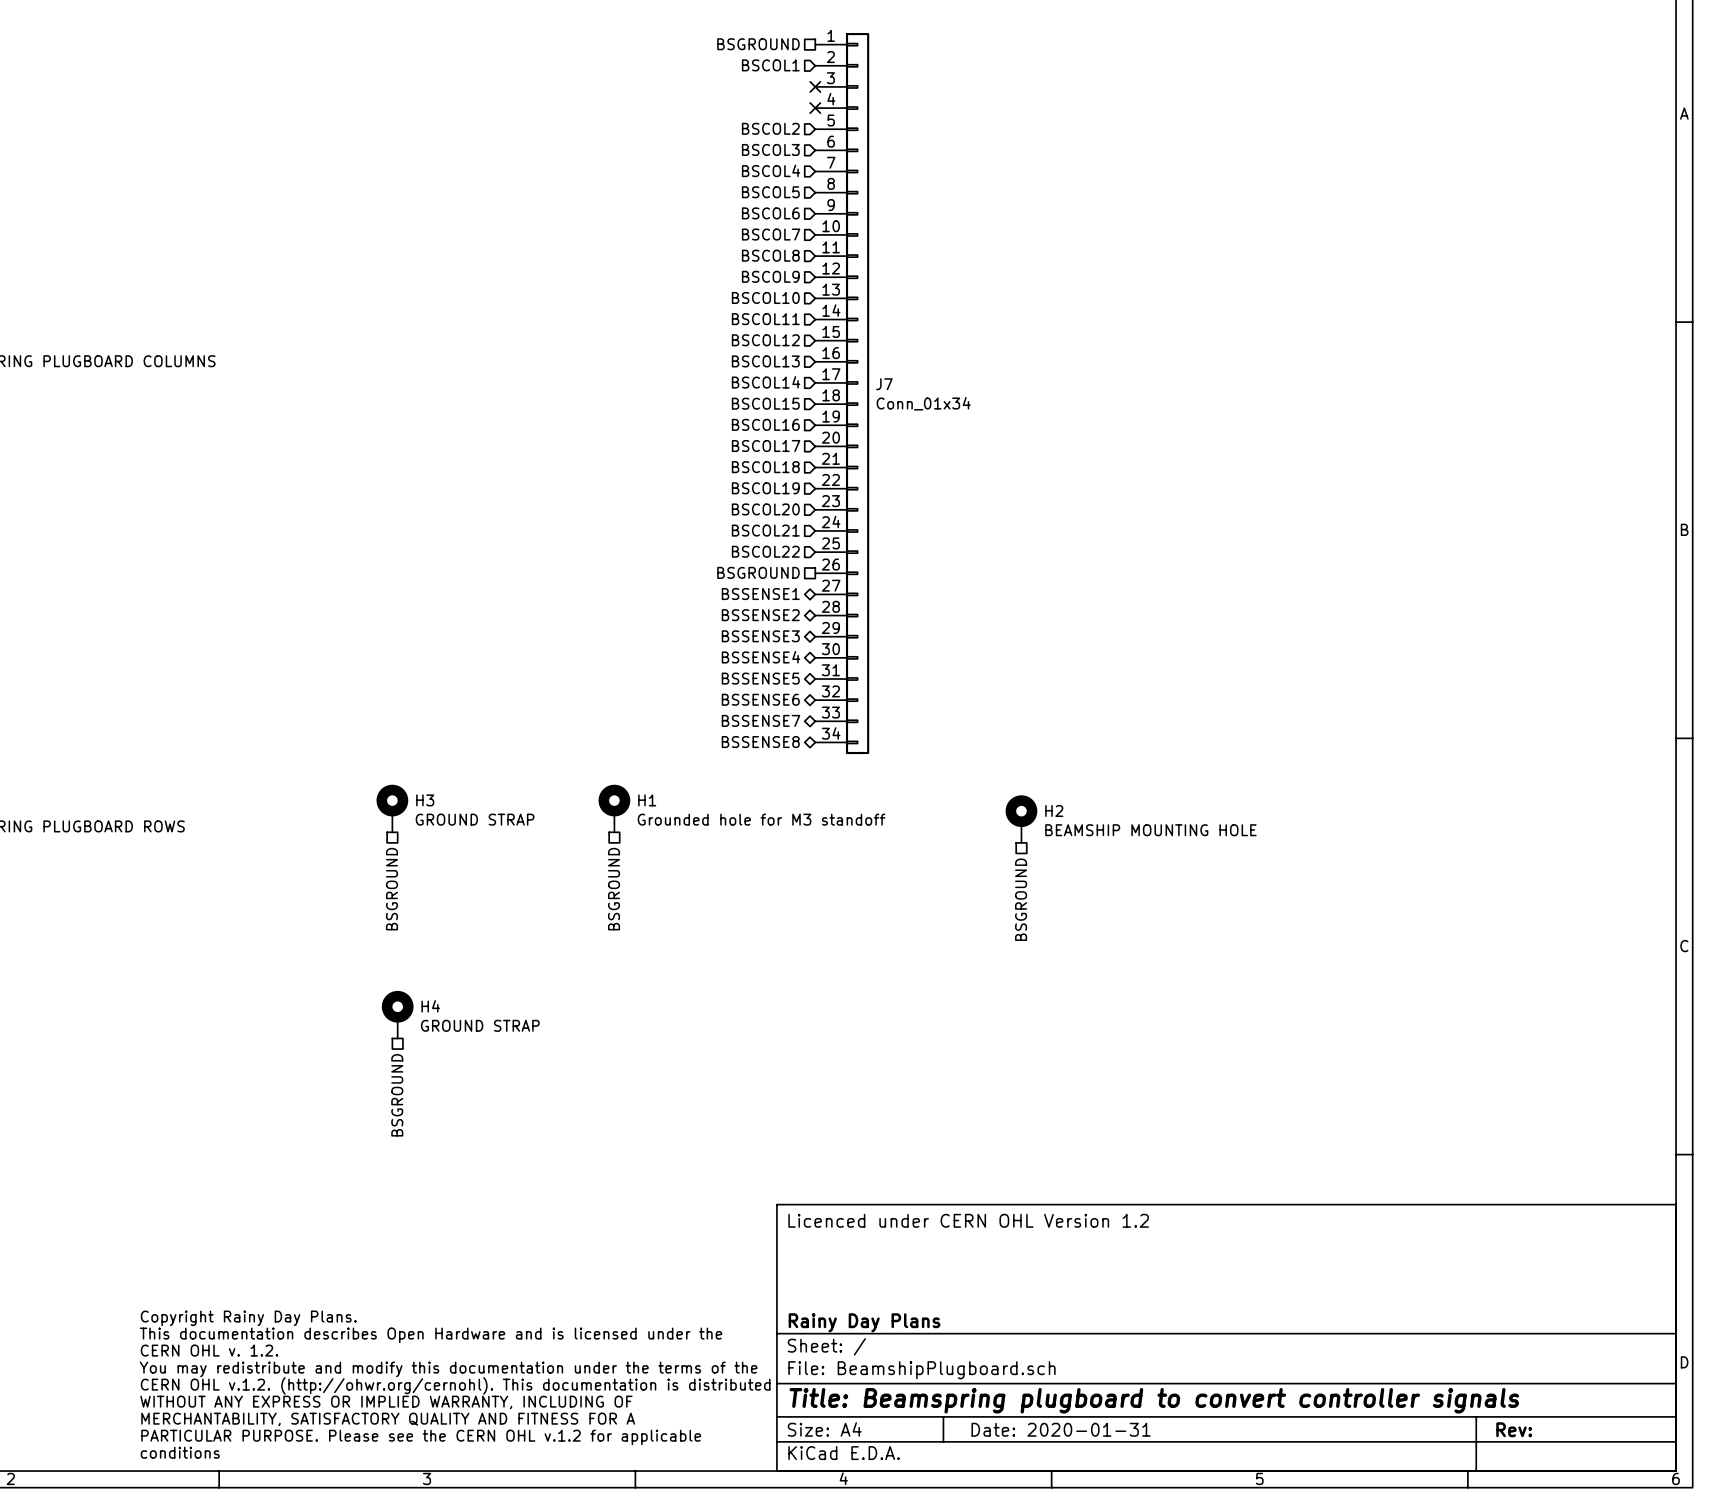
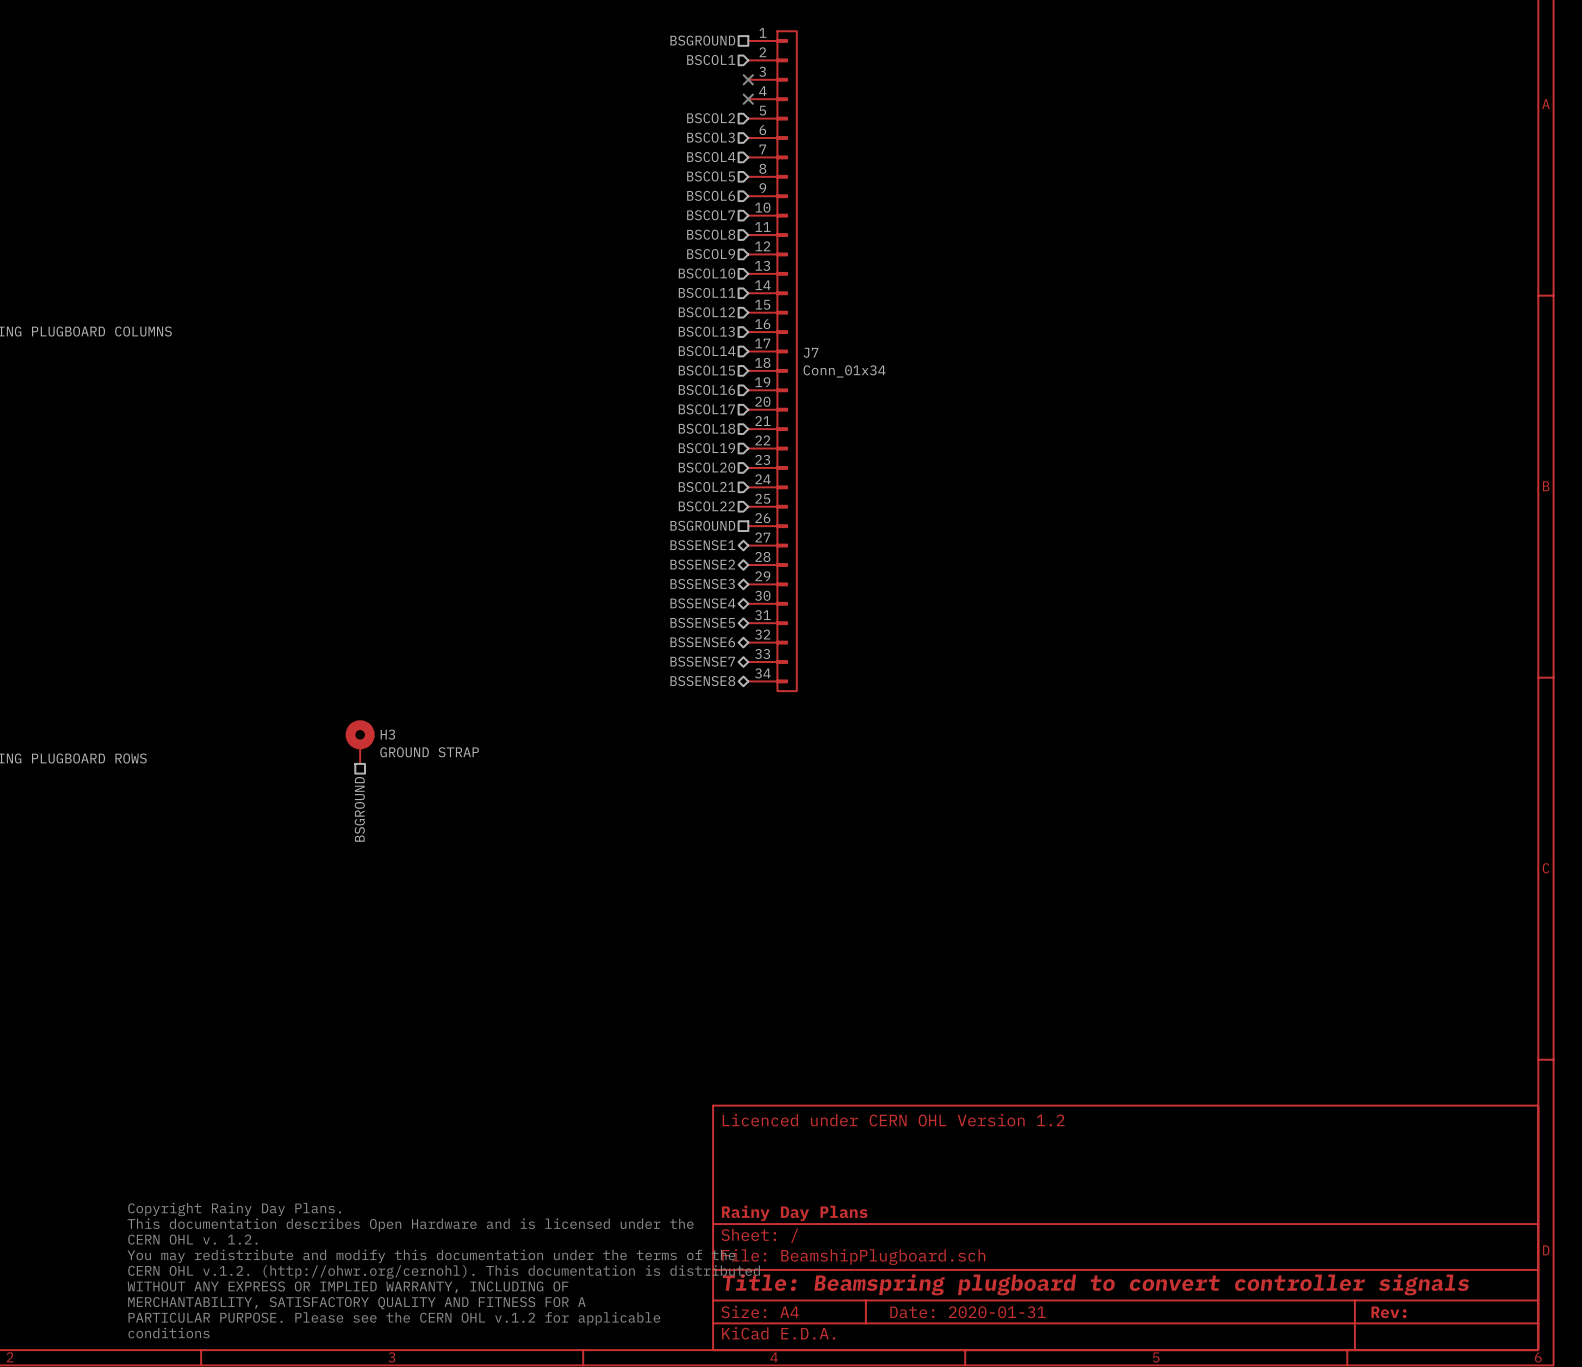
H1: Grounded hole for M3 standoff (614, 808) -> none
H2: BEAMSHIP MOUNTING HOLE (1021, 819) -> none
hierarchical label: BSGROUND (614, 889) -> none
hierarchical label: BSGROUND (1021, 899) -> none
H4: GROUND STRAP (397, 1014) -> none
hierarchical label: BSGROUND (397, 1095) -> none

